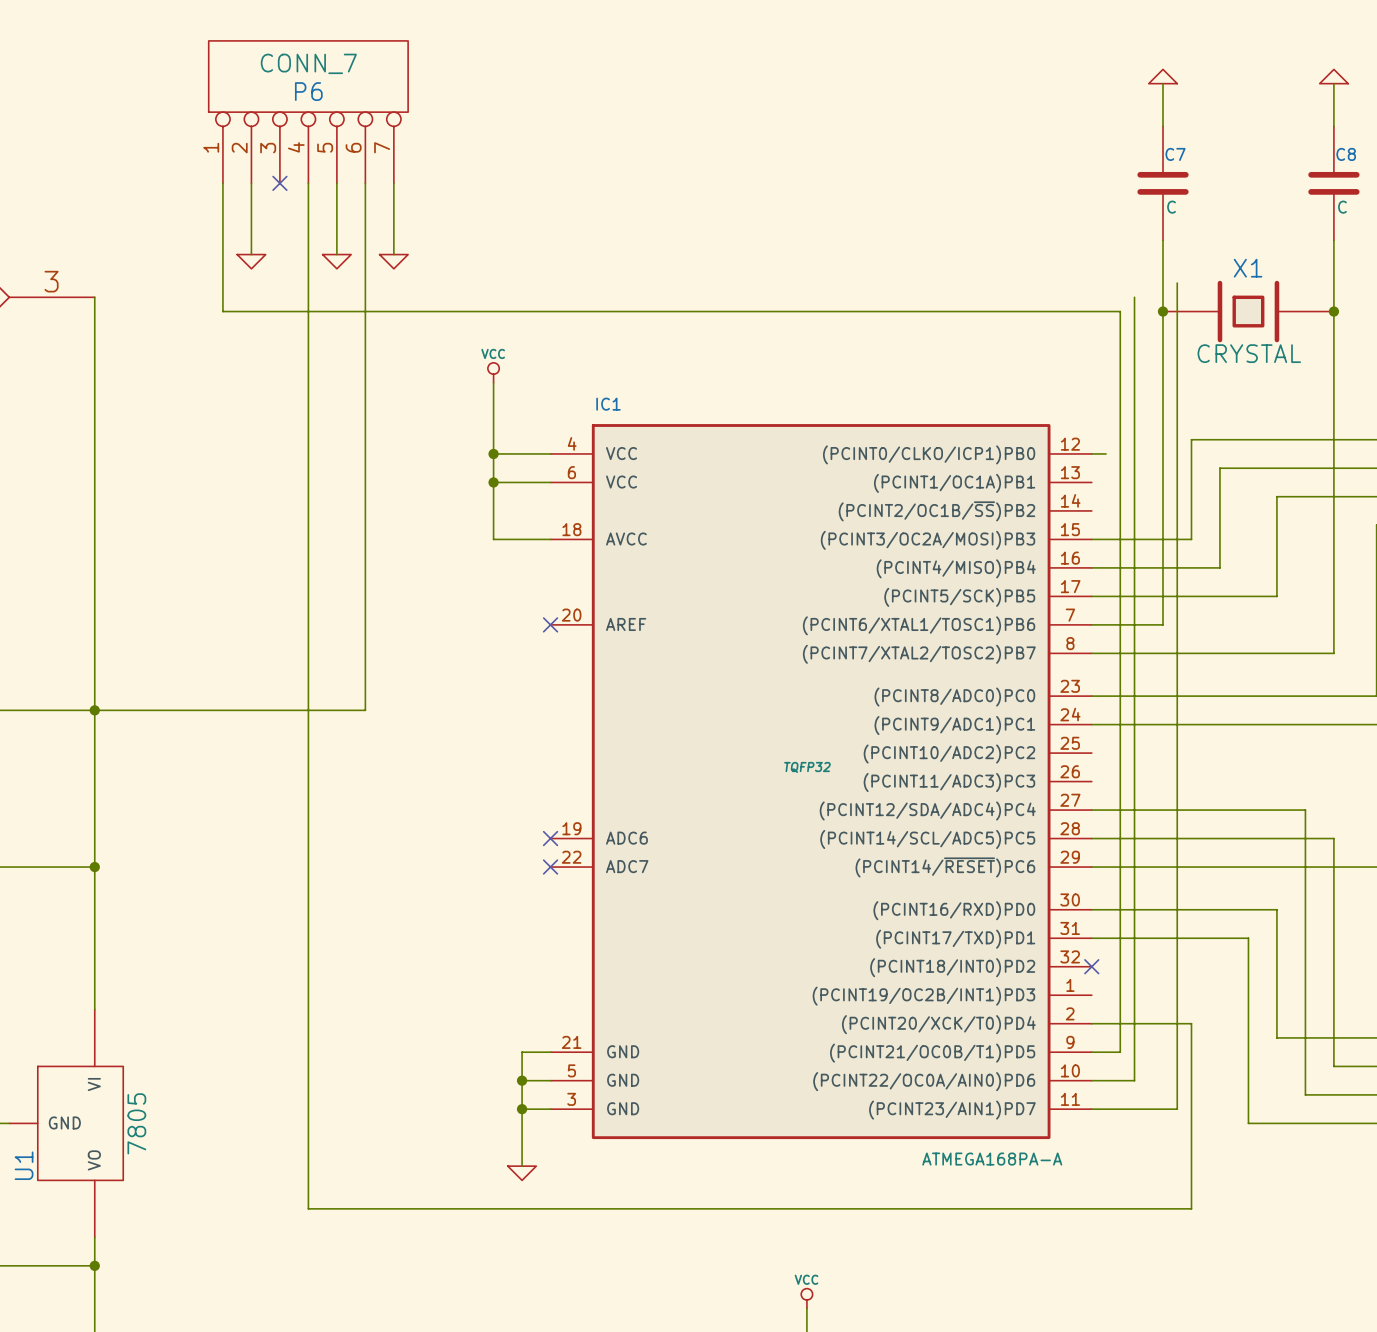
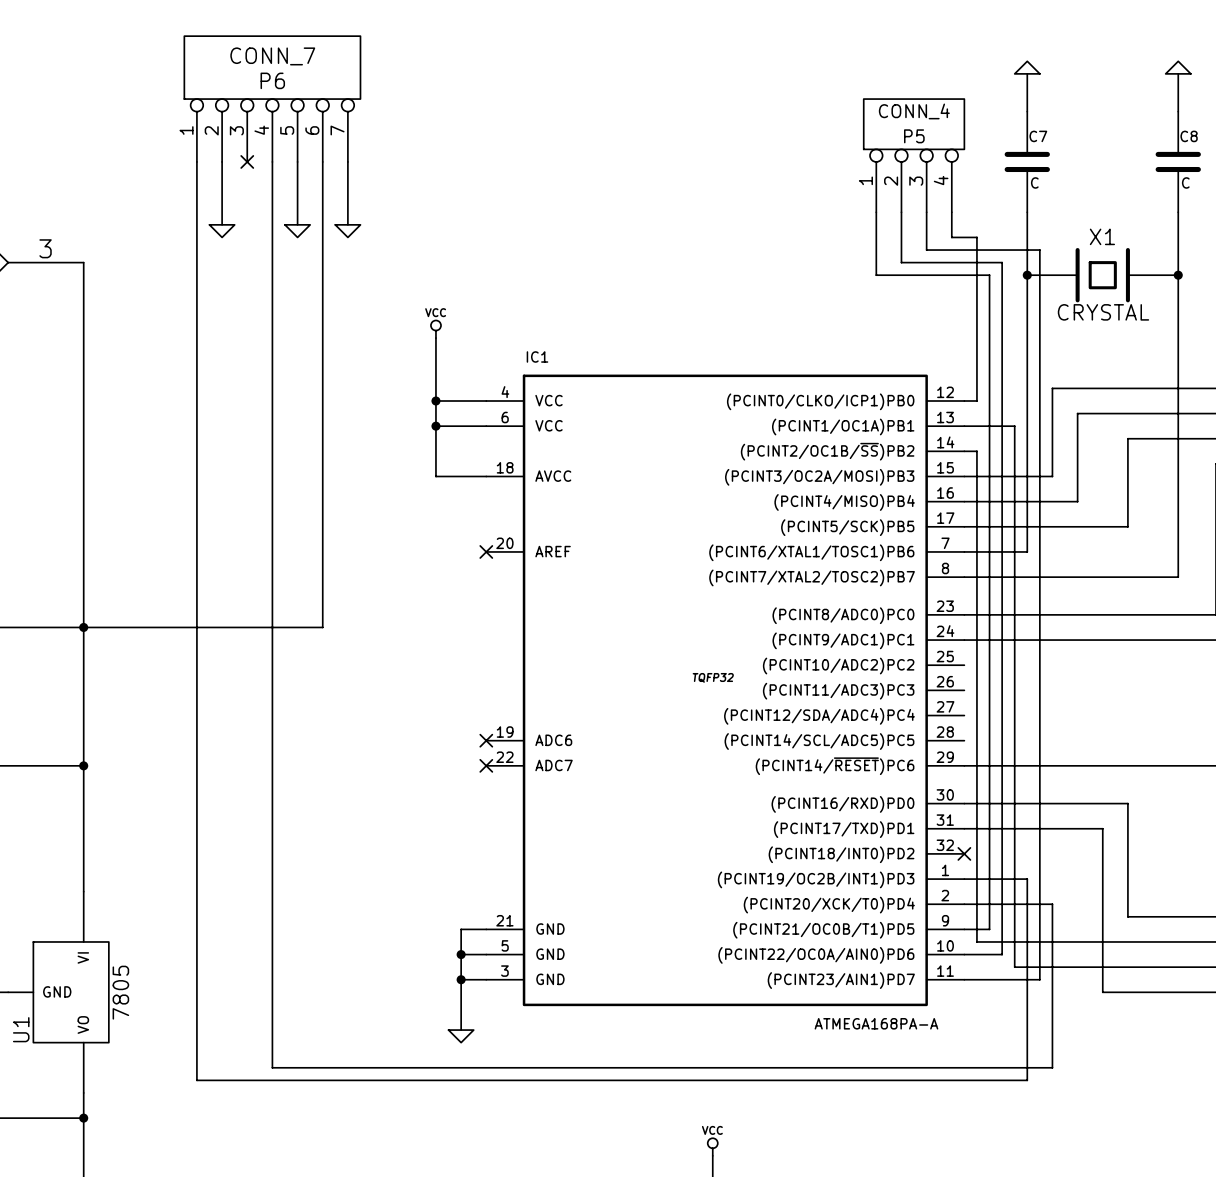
P5: none -> CONN_4 (914, 155)
wire: none -> (876, 212) (876, 275)
wire: none -> (901, 212) (901, 262) (1002, 262)
wire: none -> (926, 212) (926, 250) (1039, 250)
wire: none -> (951, 212) (951, 237) (976, 237) (976, 401)
wire: (222, 311) (992, 311) -> (196, 275) (196, 1080) (1027, 1080) (1027, 879) (964, 879)
wire: (1091, 810) (1305, 810) (1305, 1094) -> (964, 426) (1014, 426) (1014, 967) (1153, 967)
wire: (1091, 838) (1333, 838) (1333, 1066) -> (964, 451) (976, 451) (976, 941) (1178, 941)

